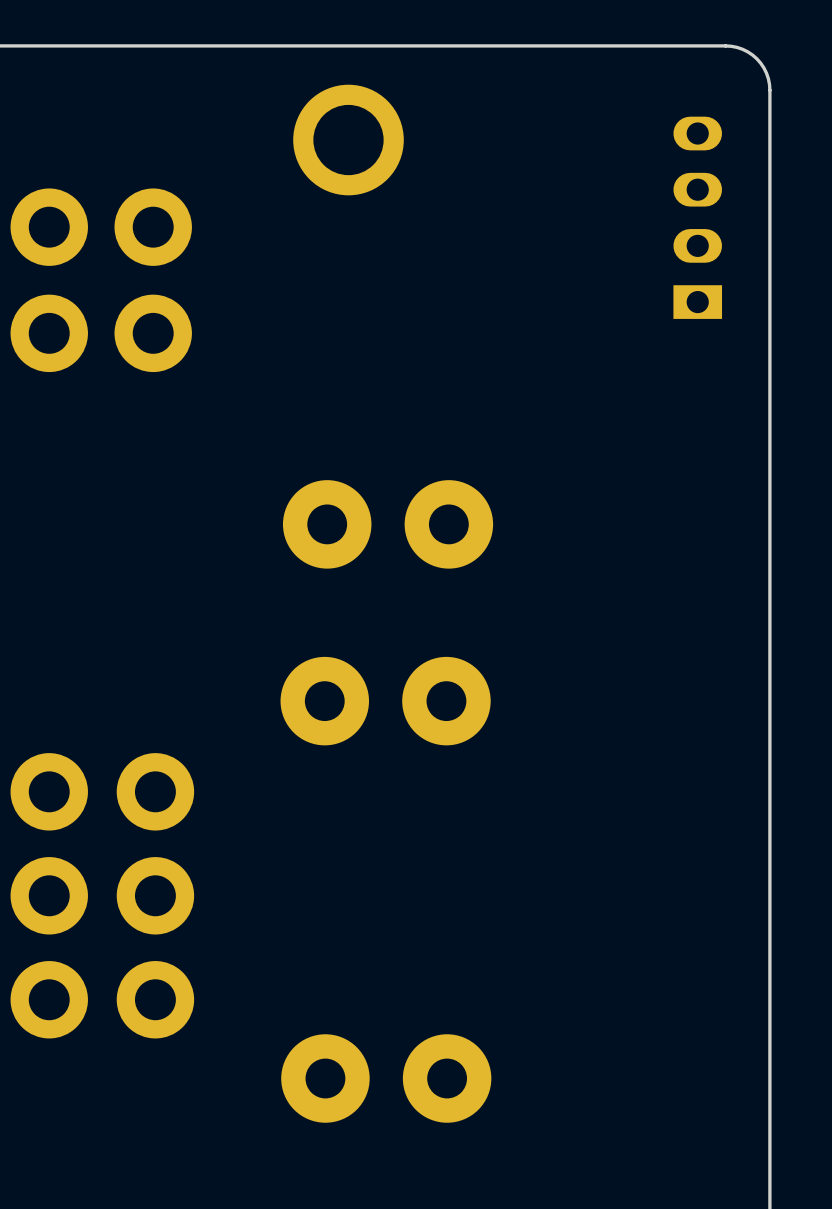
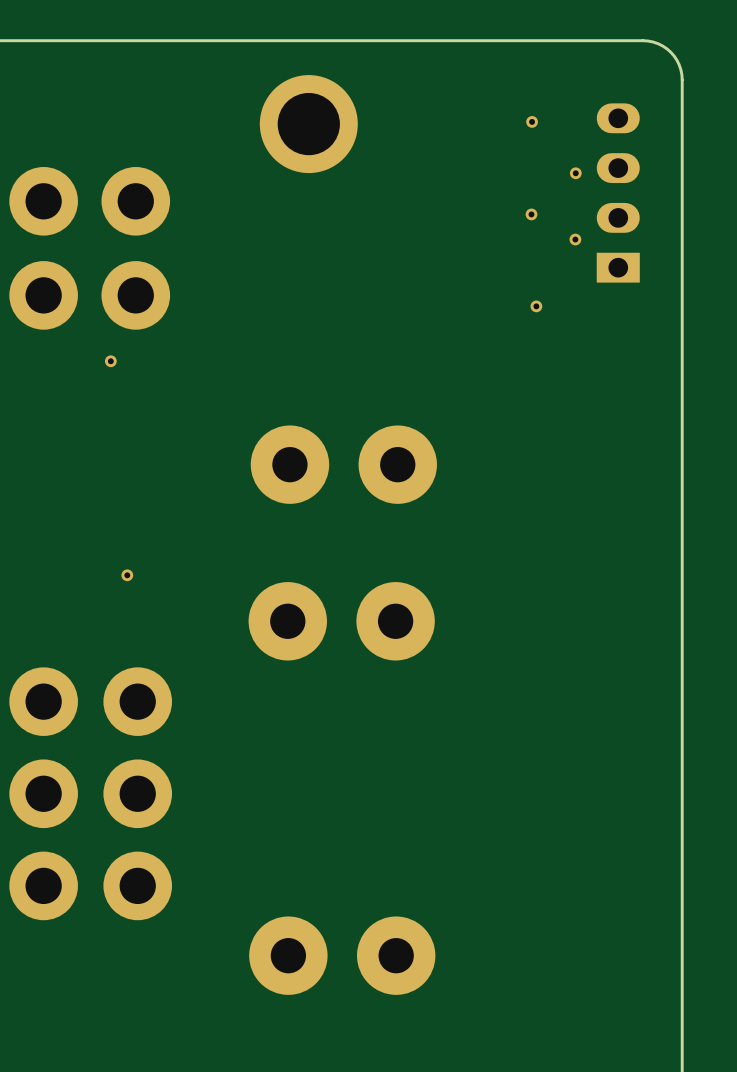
part: none -> (532, 121)
part: none -> (575, 173)
part: none -> (531, 214)
part: none -> (575, 239)
part: none -> (536, 306)
part: none -> (110, 361)
part: none -> (127, 575)

